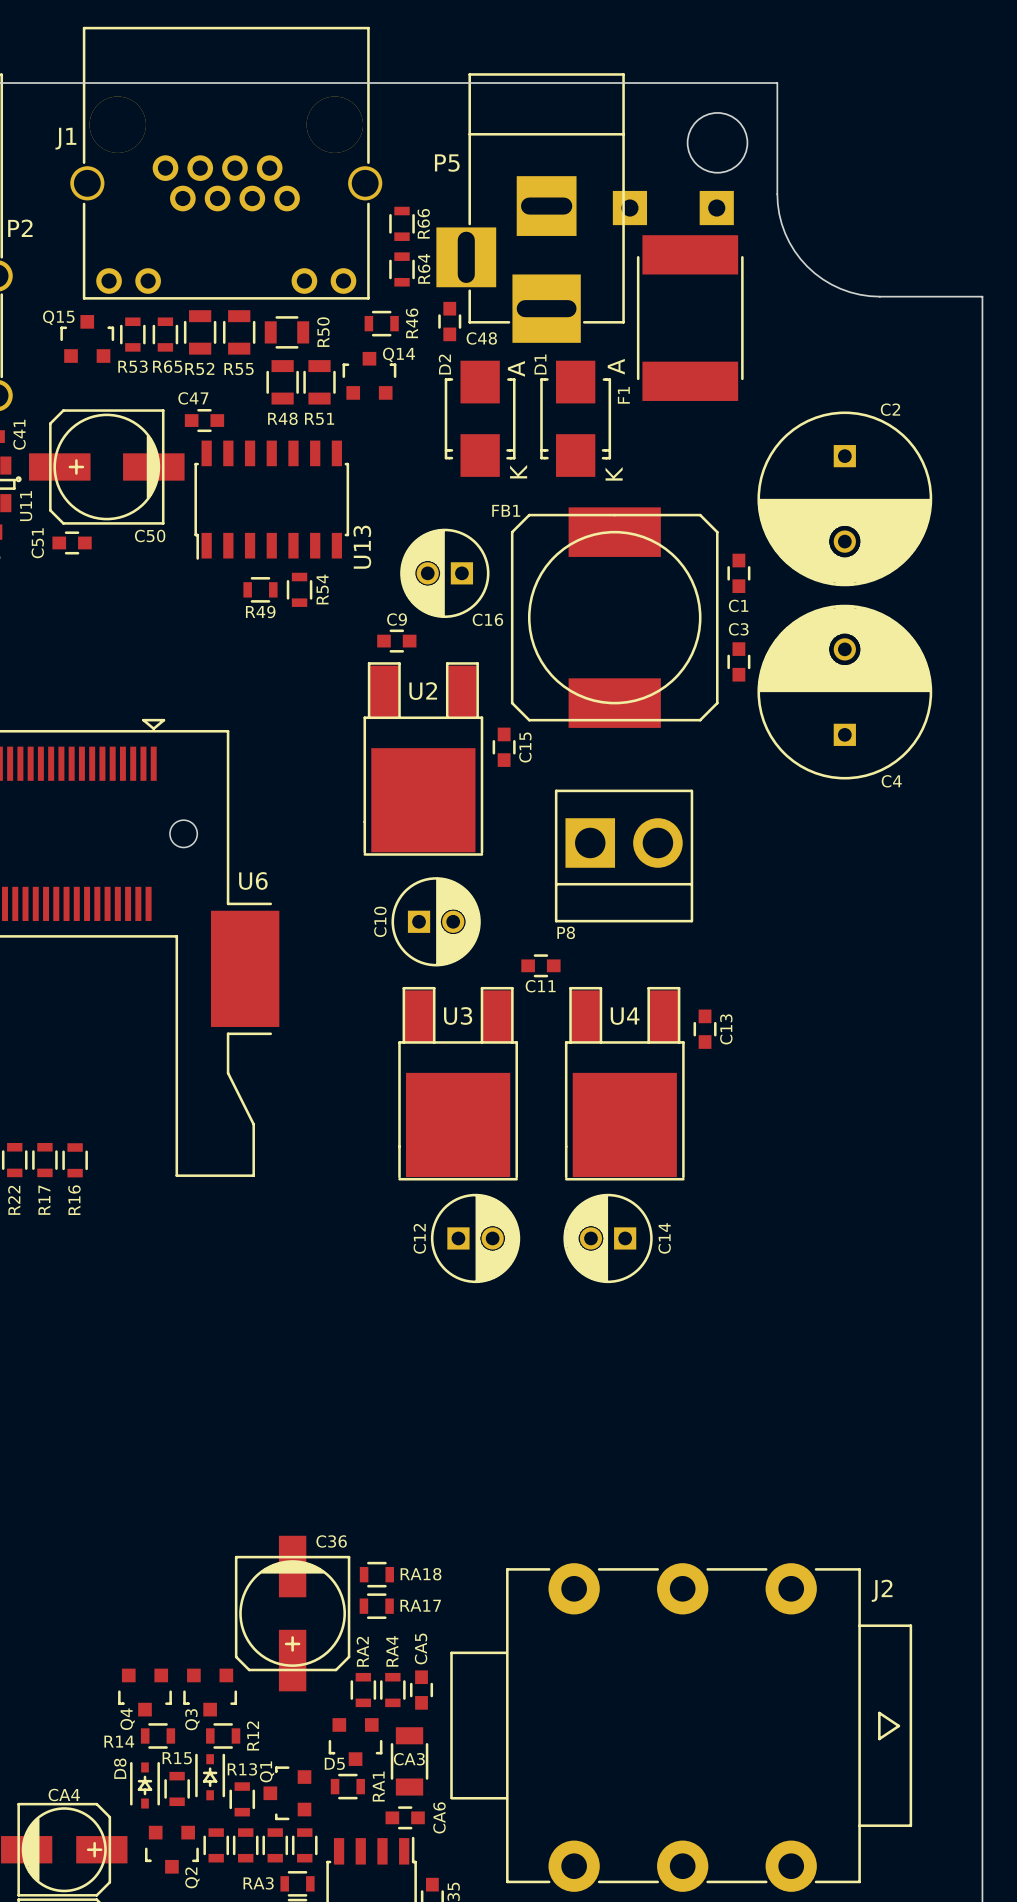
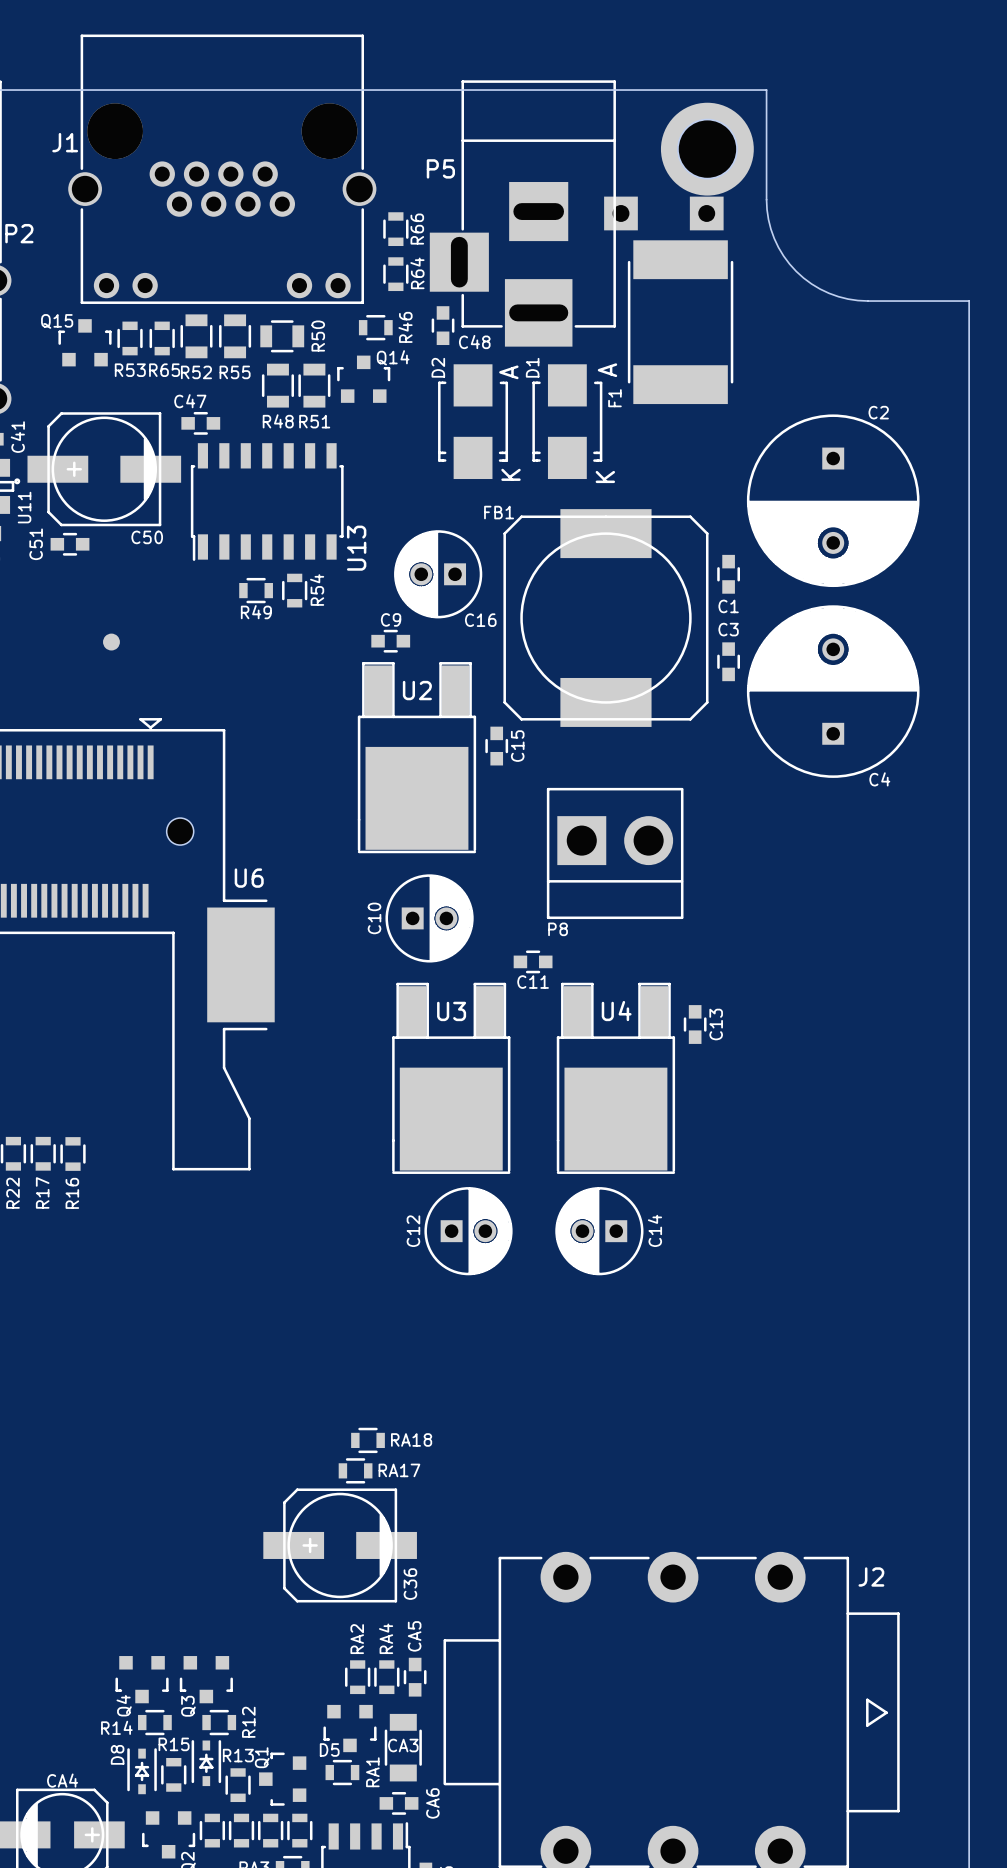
part: none -> (707, 149)
part: none -> (111, 642)
RA18 position: (376, 1574) -> (368, 1440)
RA17 position: (376, 1606) -> (355, 1470)
C36 rotation: 0° (292, 1613) -> 90° clockwise (340, 1545)

